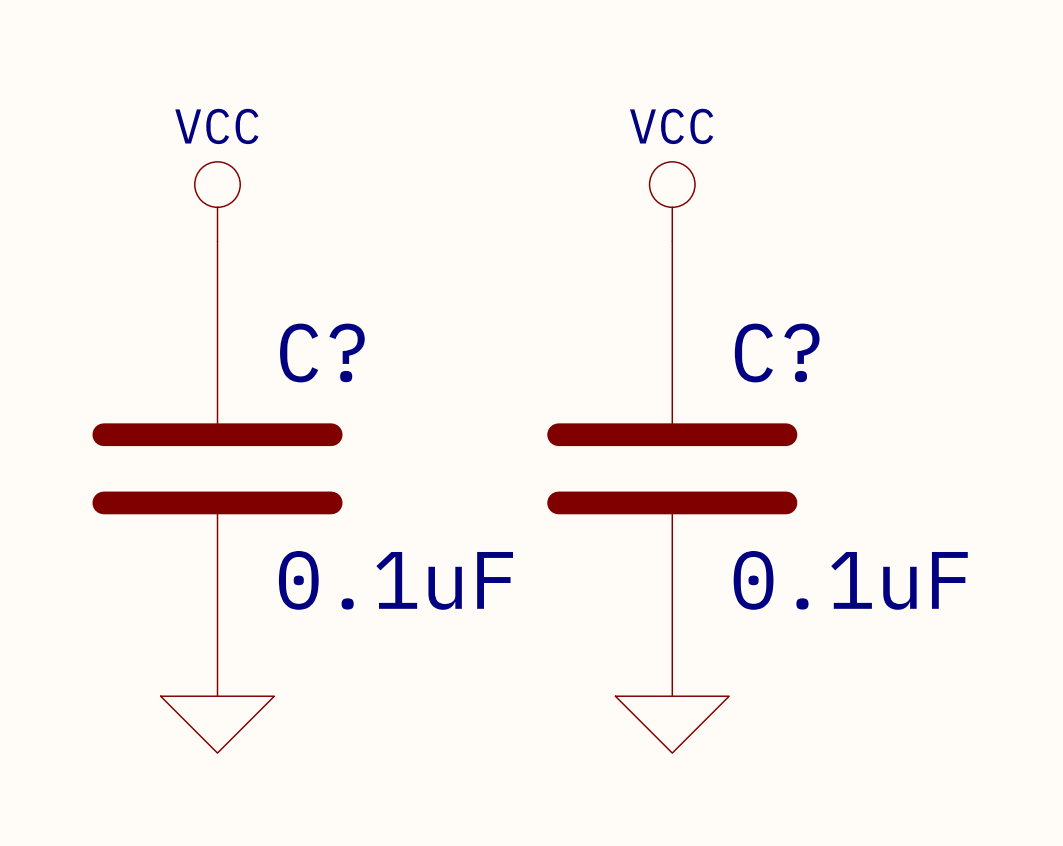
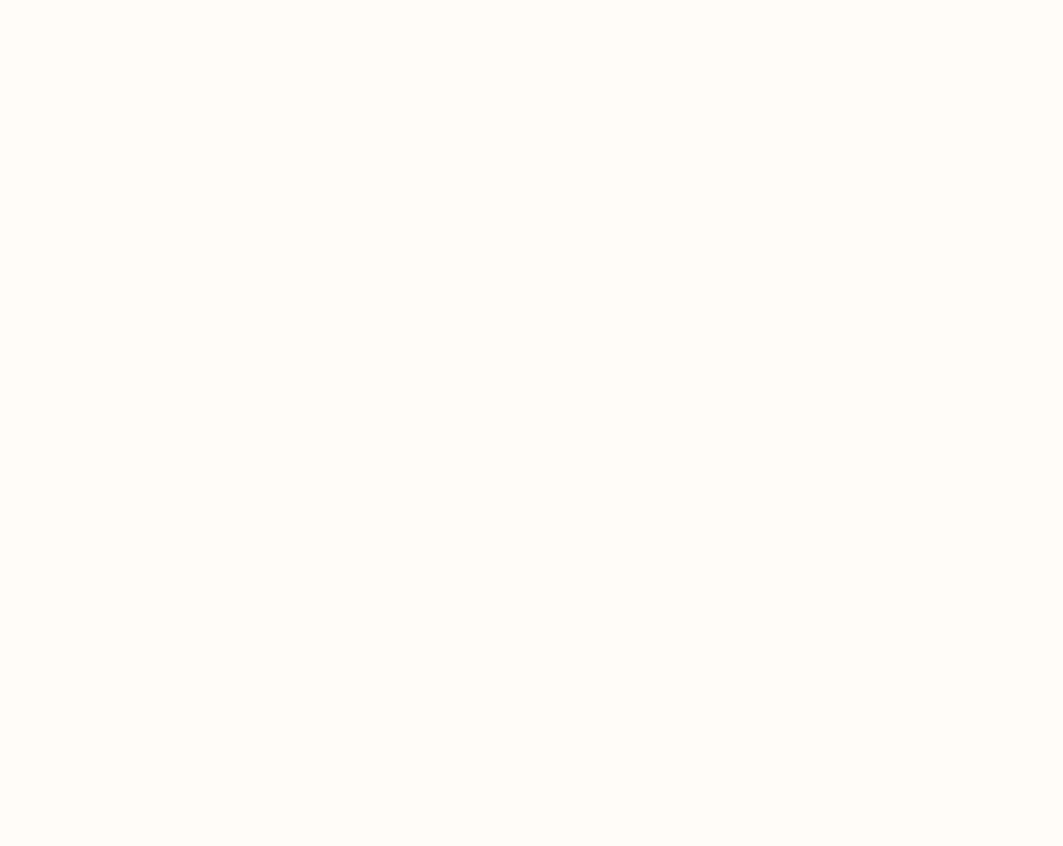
power symbol: VCC (217, 201) -> none
power symbol: VCC (672, 201) -> none
C?: 0.1uF (217, 468) -> none
C?: 0.1uF (672, 468) -> none
power symbol: (217, 724) -> none
power symbol: (672, 724) -> none

